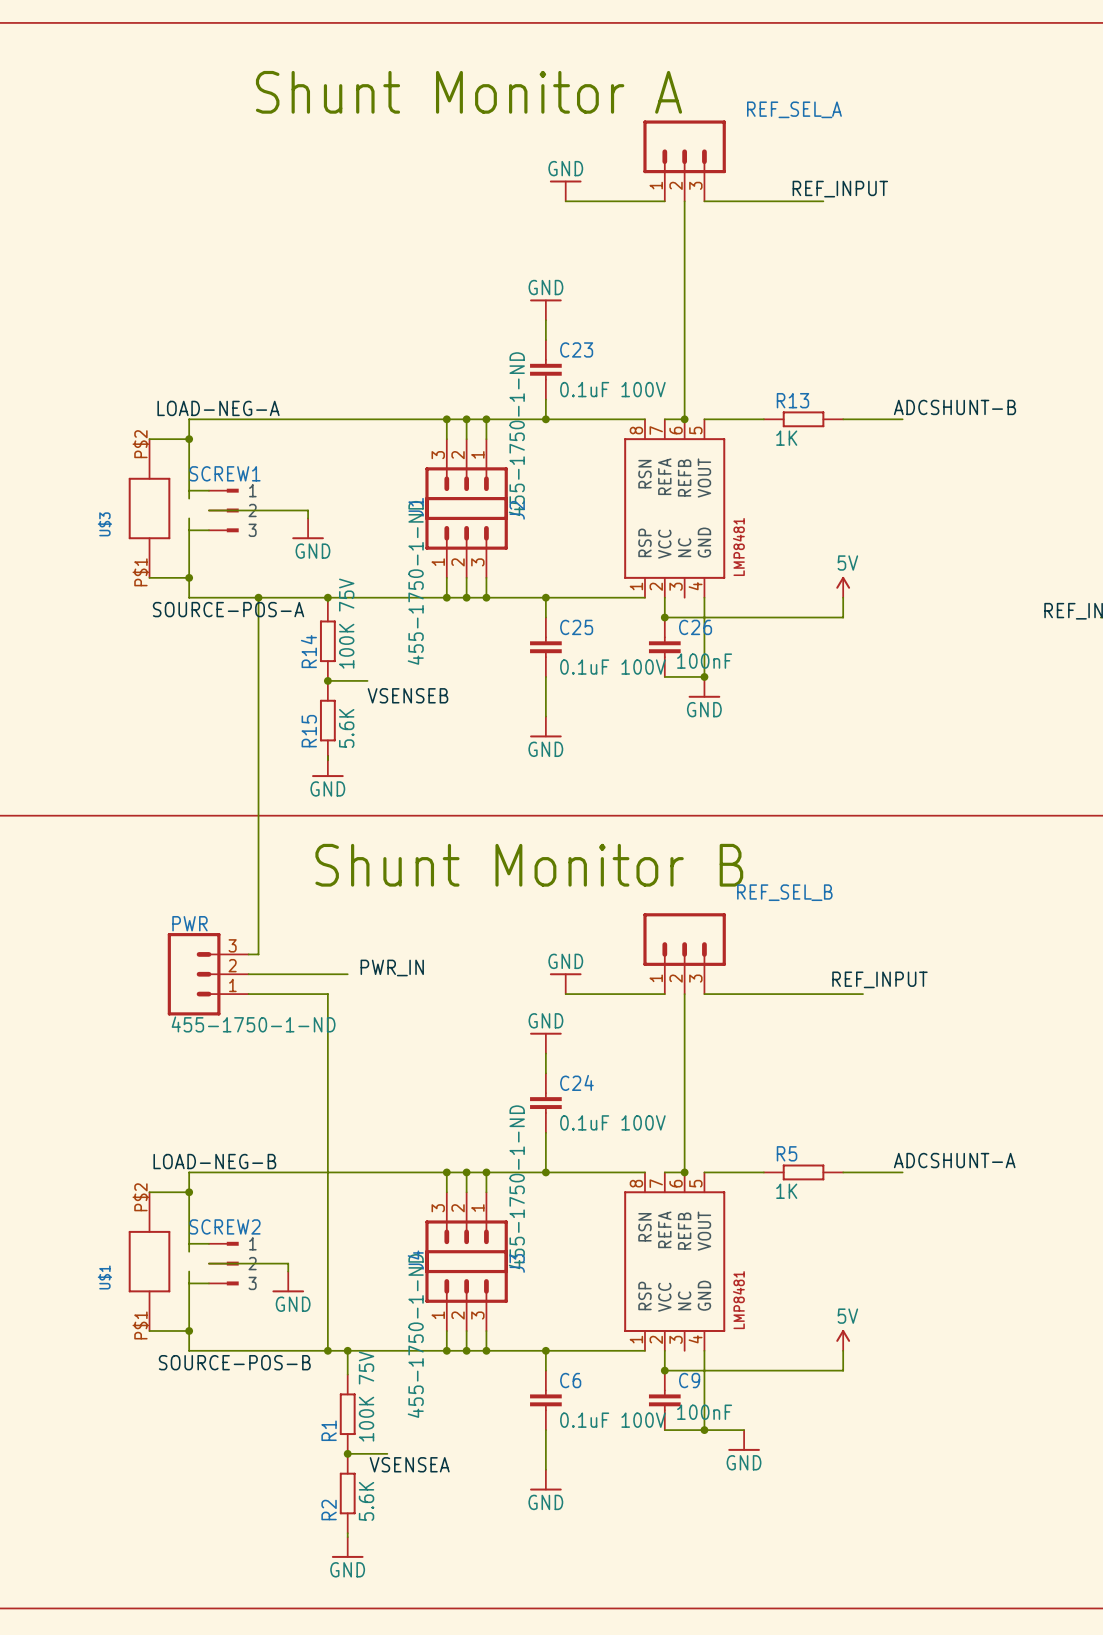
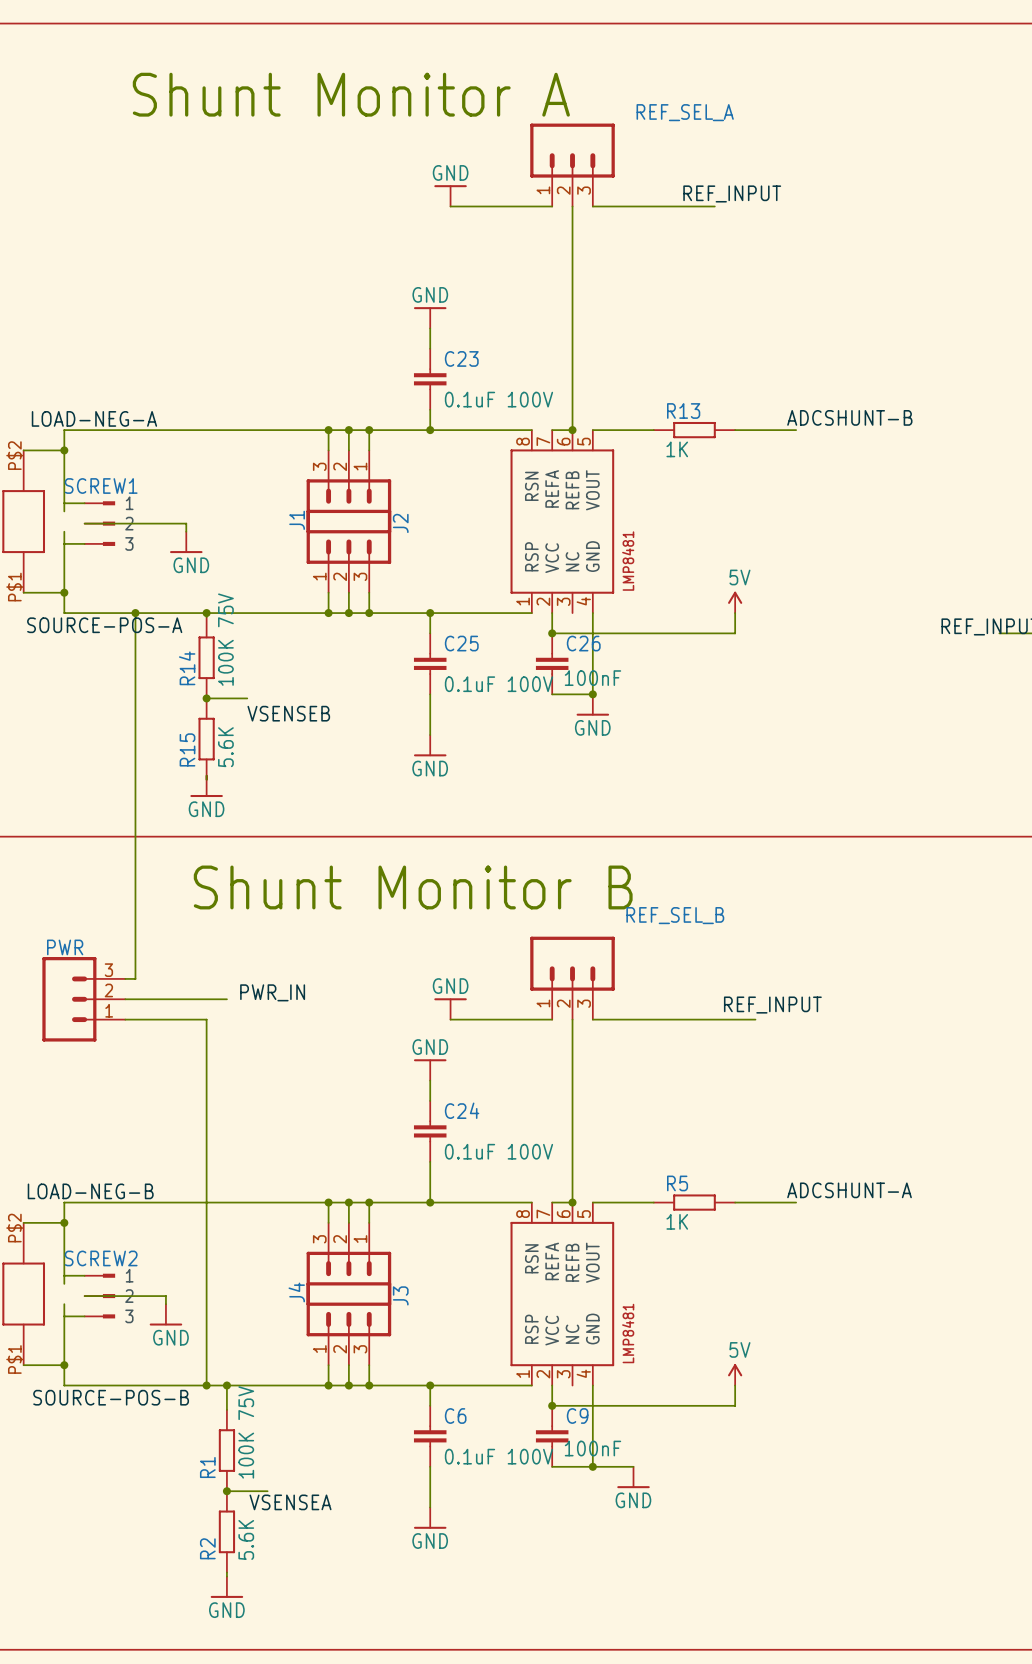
J1 value: 455-1750-1-ND (516, 434) -> none
J2 value: 455-1750-1-ND (415, 582) -> none
PWR value: 455-1750-1-ND (253, 1024) -> none
J4 value: 455-1750-1-ND (516, 1187) -> none
J3 value: 455-1750-1-ND (415, 1335) -> none

